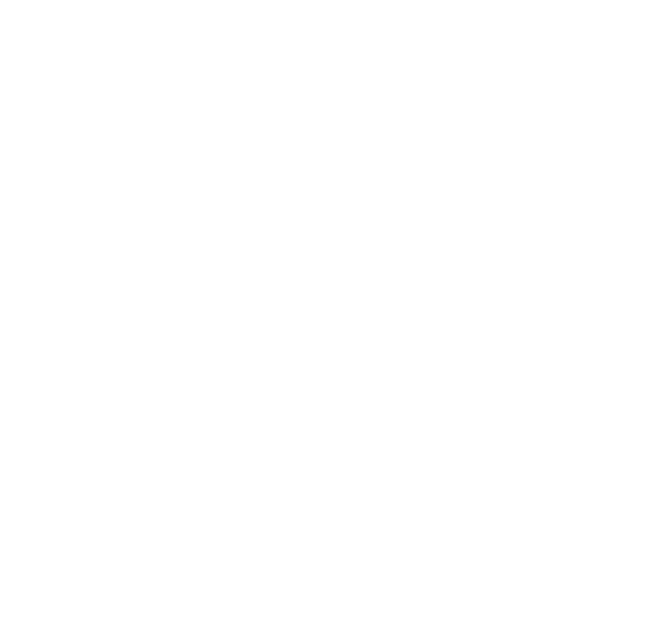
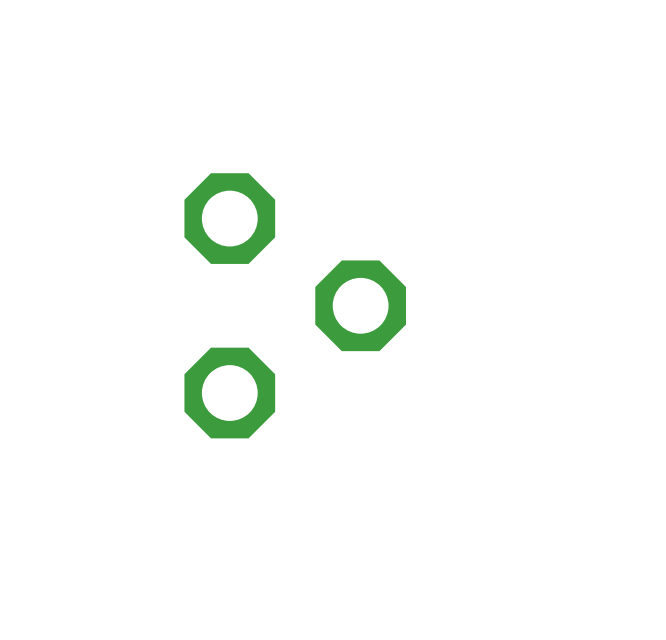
part: none -> (295, 305)

